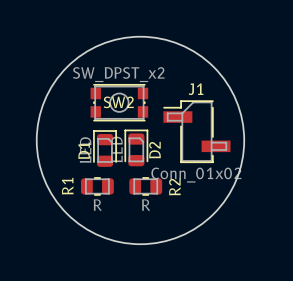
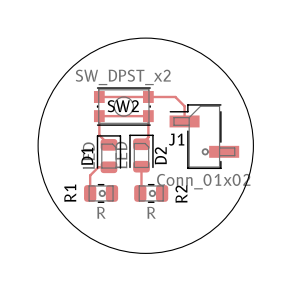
J1 name position: J1 (196, 89) -> J1 (176, 139)
top track: none -> (99, 96) (175, 96) (184, 106) (184, 121)
top track: none -> (141, 144) (148, 137) (148, 116) (99, 116) (99, 135) (108, 144)
via: none -> (205, 151)
top track: none -> (141, 166) (140, 193)
top track: none -> (108, 167) (98, 167) (90, 175) (90, 193)
via: none -> (102, 193)
via: none -> (152, 193)

